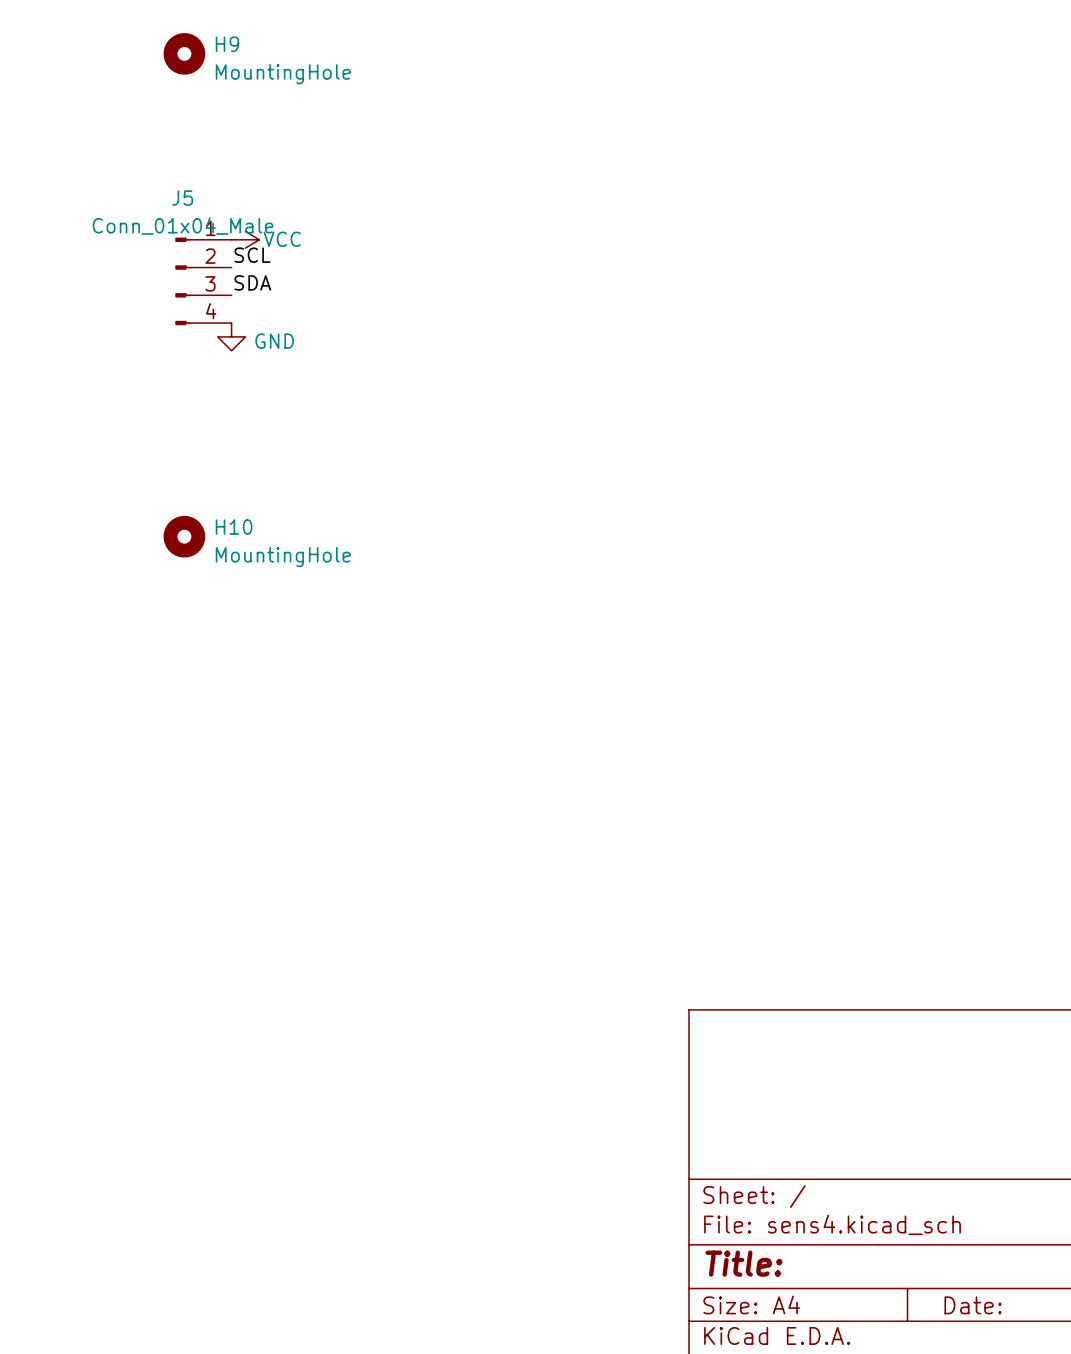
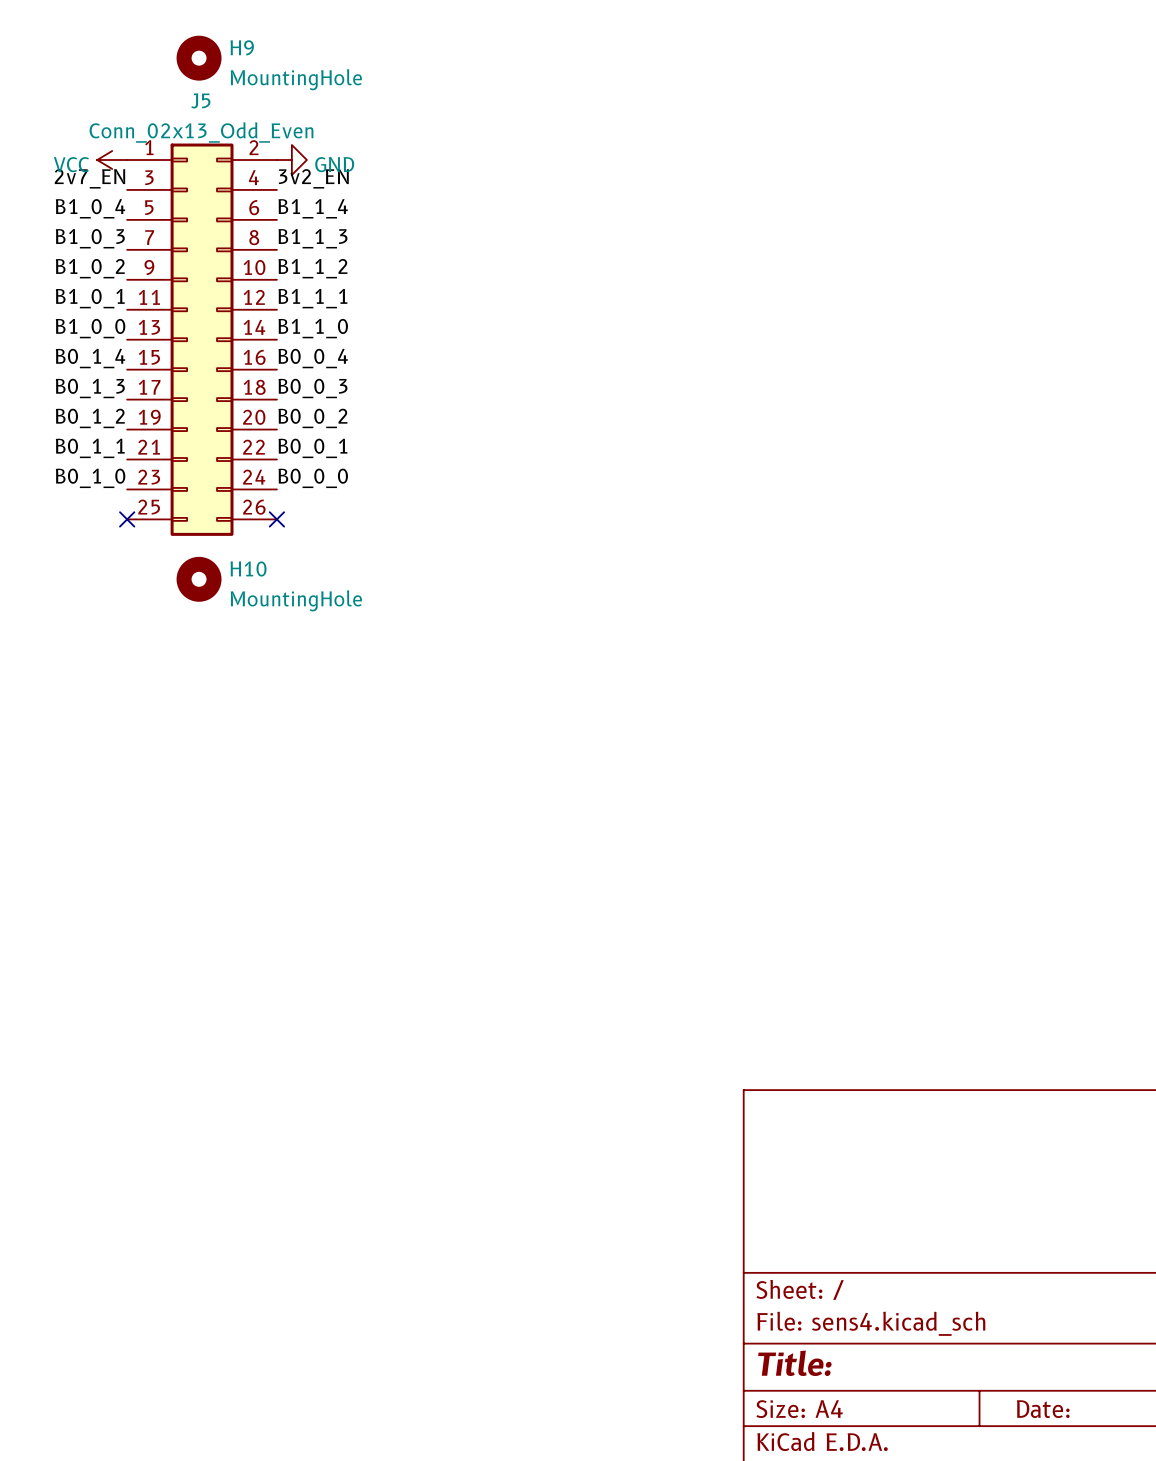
label: none -> 2v7_EN (89, 178)
label: none -> 3v2_EN (313, 178)
label: none -> B1_0_4 (90, 208)
label: none -> B1_1_4 (313, 208)
J5 name position: J5 (182, 198) -> J5 (200, 100)
label: none -> B1_0_3 (90, 238)
label: none -> B1_1_3 (312, 238)
J5 value: Conn_01x04_Male (183, 226) -> Conn_02x13_Odd_Even (201, 132)
J5 symbol: [175, 237, 232, 326] -> [127, 143, 277, 536]
power symbol rotation: 0° (245, 239) -> 180° (112, 160)
power symbol position: VCC (245, 239) -> VCC (112, 160)
label: none -> B1_0_2 (90, 268)
label: none -> B1_1_2 (312, 268)
label: SCL (252, 255) -> none
label: none -> B1_0_1 (90, 298)
label: none -> B1_1_1 (312, 298)
label: SDA (252, 282) -> none
label: none -> B1_0_0 (90, 328)
label: none -> B1_1_0 (313, 328)
label: none -> B0_1_4 (90, 358)
label: none -> B0_0_4 (313, 358)
power symbol rotation: 0° (231, 336) -> 90° counterclockwise (291, 160)
power symbol position: GND (231, 336) -> GND (291, 160)
label: none -> B0_1_3 (90, 388)
label: none -> B0_0_3 (312, 388)
label: none -> B0_1_2 (90, 418)
label: none -> B0_0_2 (312, 418)
label: none -> B0_1_1 (90, 448)
label: none -> B0_0_1 (312, 448)
label: none -> B0_1_0 (90, 478)
label: none -> B0_0_0 (313, 478)
no-connect mark: none -> (127, 519)
no-connect mark: none -> (276, 519)

